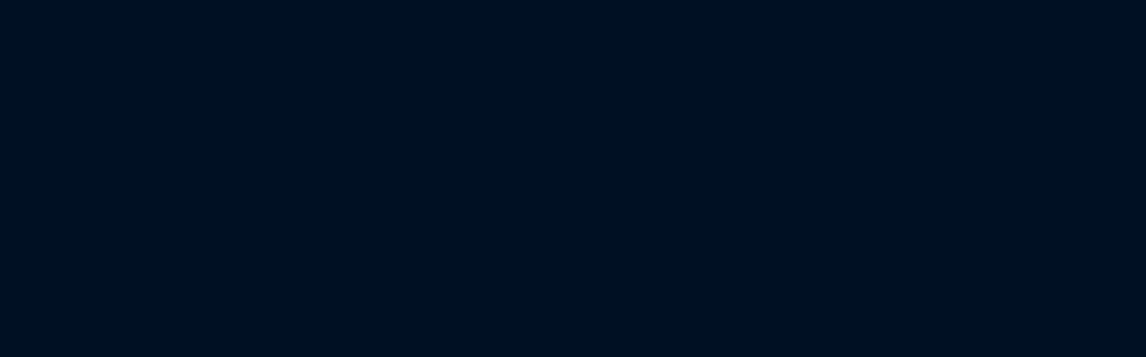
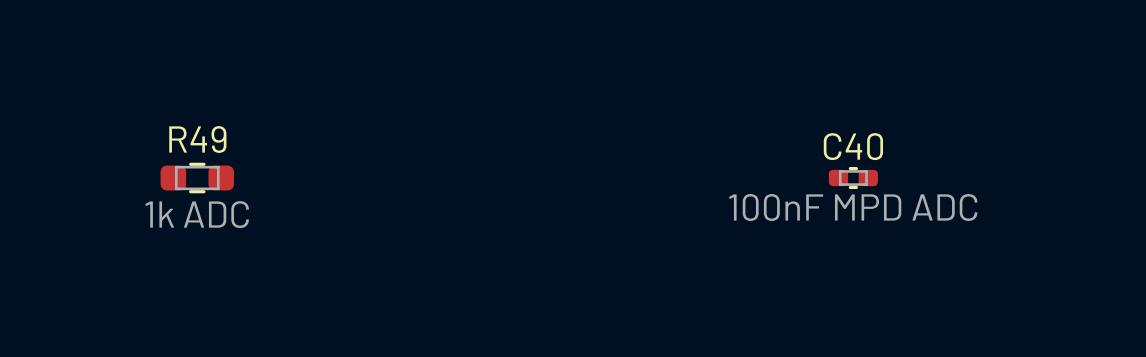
R49: none -> 1k ADC (197, 178)
C40: none -> 100nF MPD ADC (853, 178)

